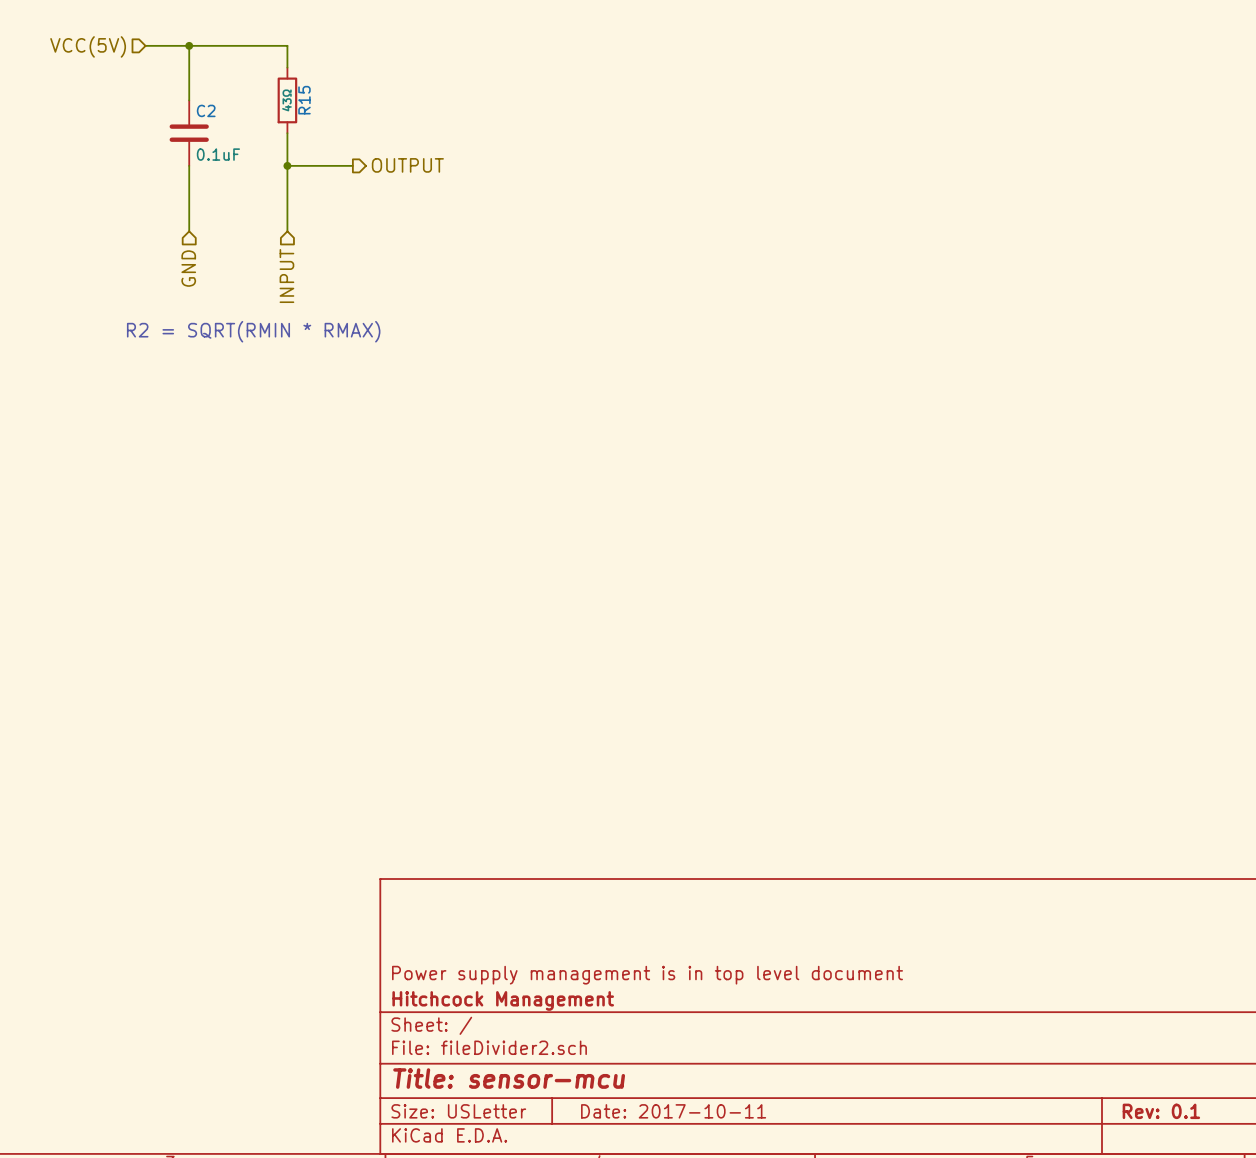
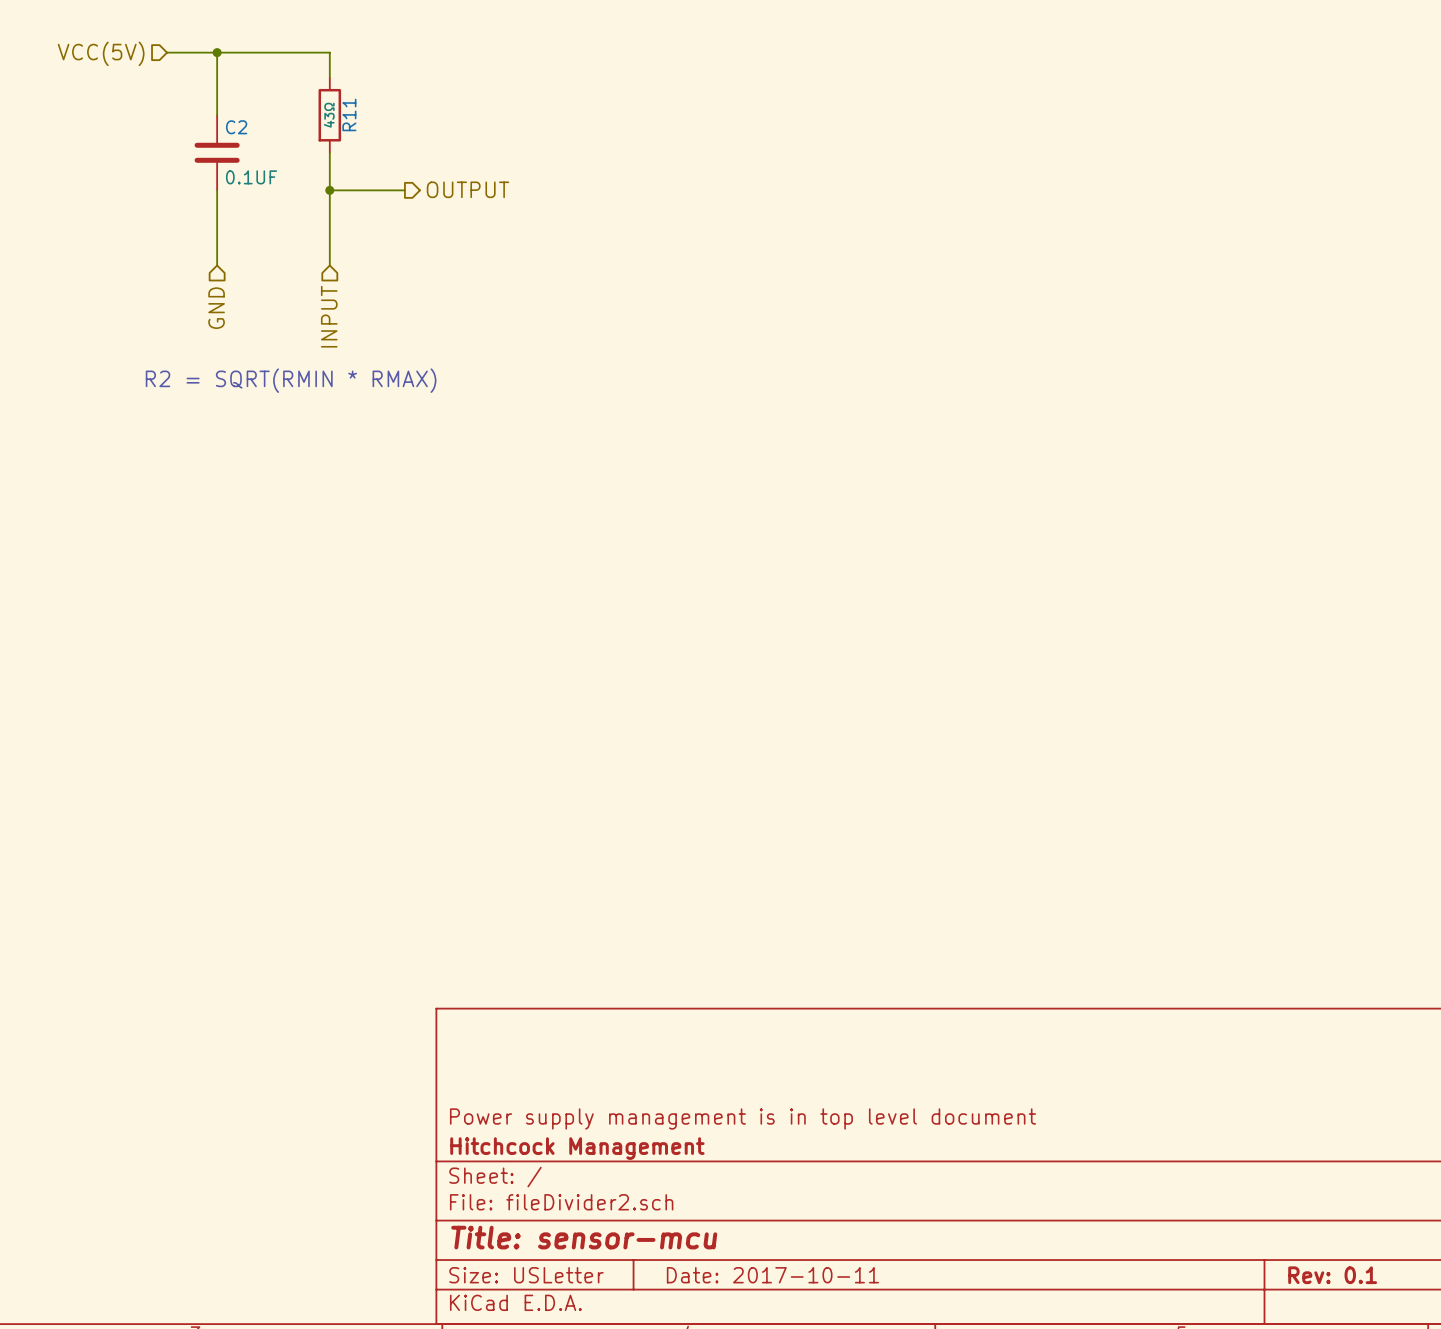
R15 name: R15 (304, 100) -> R11 (349, 114)
C2 value: 0.1uF (218, 154) -> 0.1UF (251, 177)

